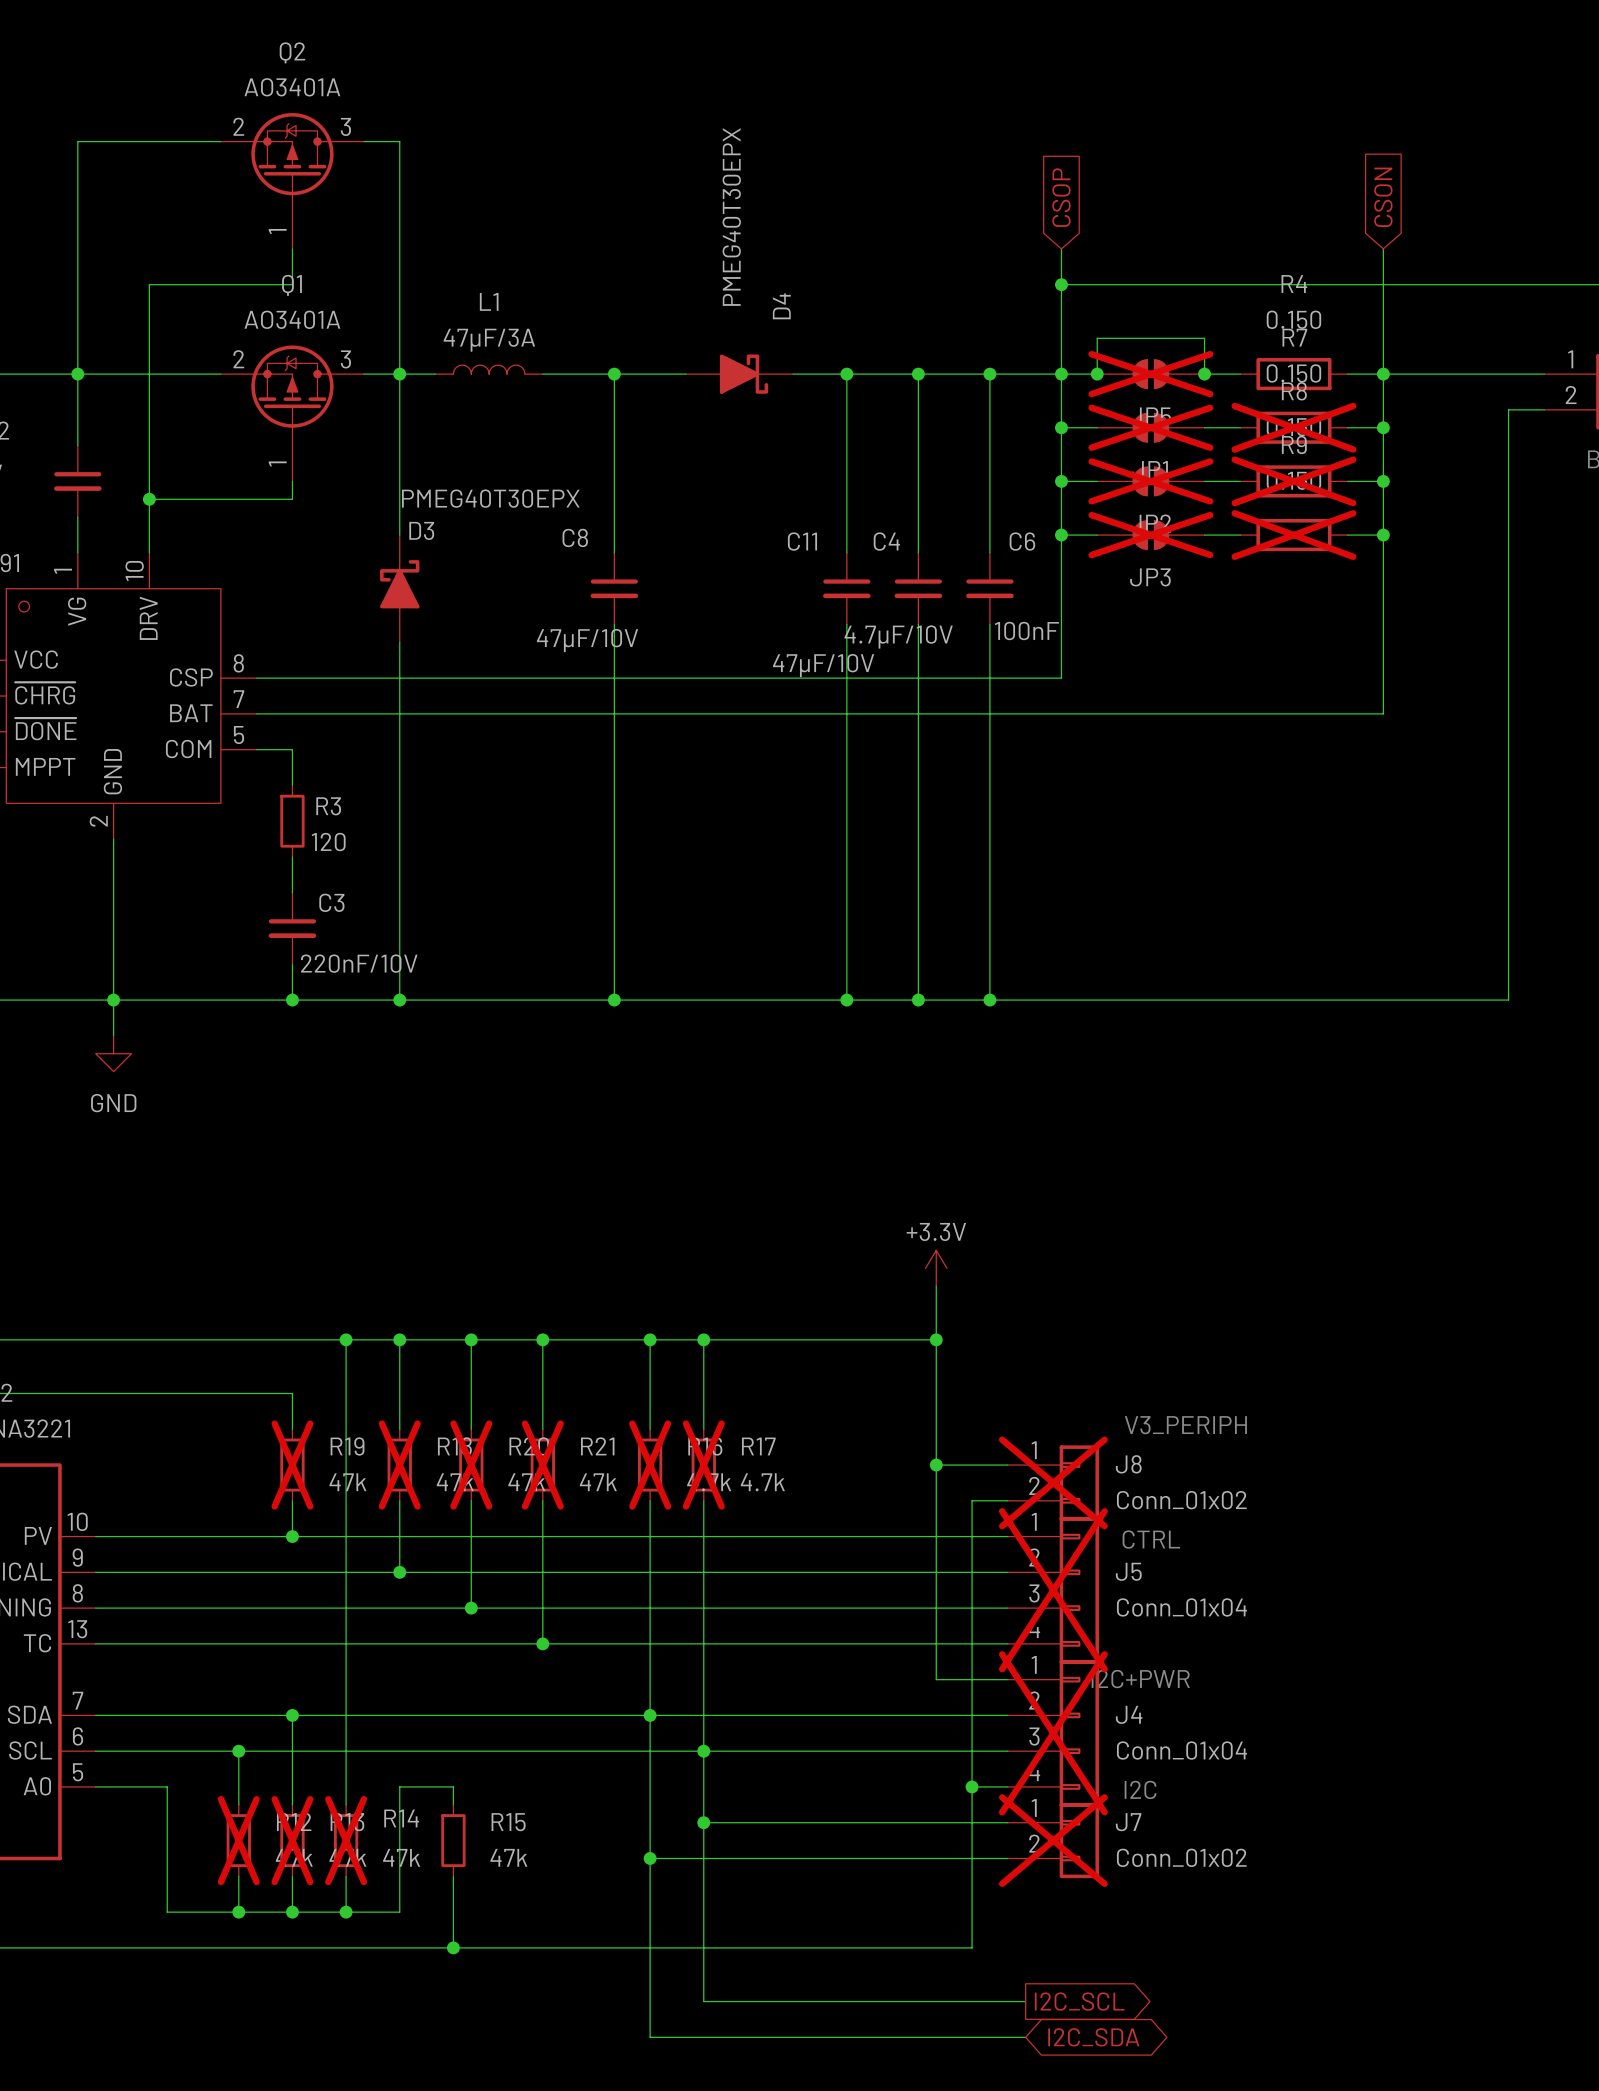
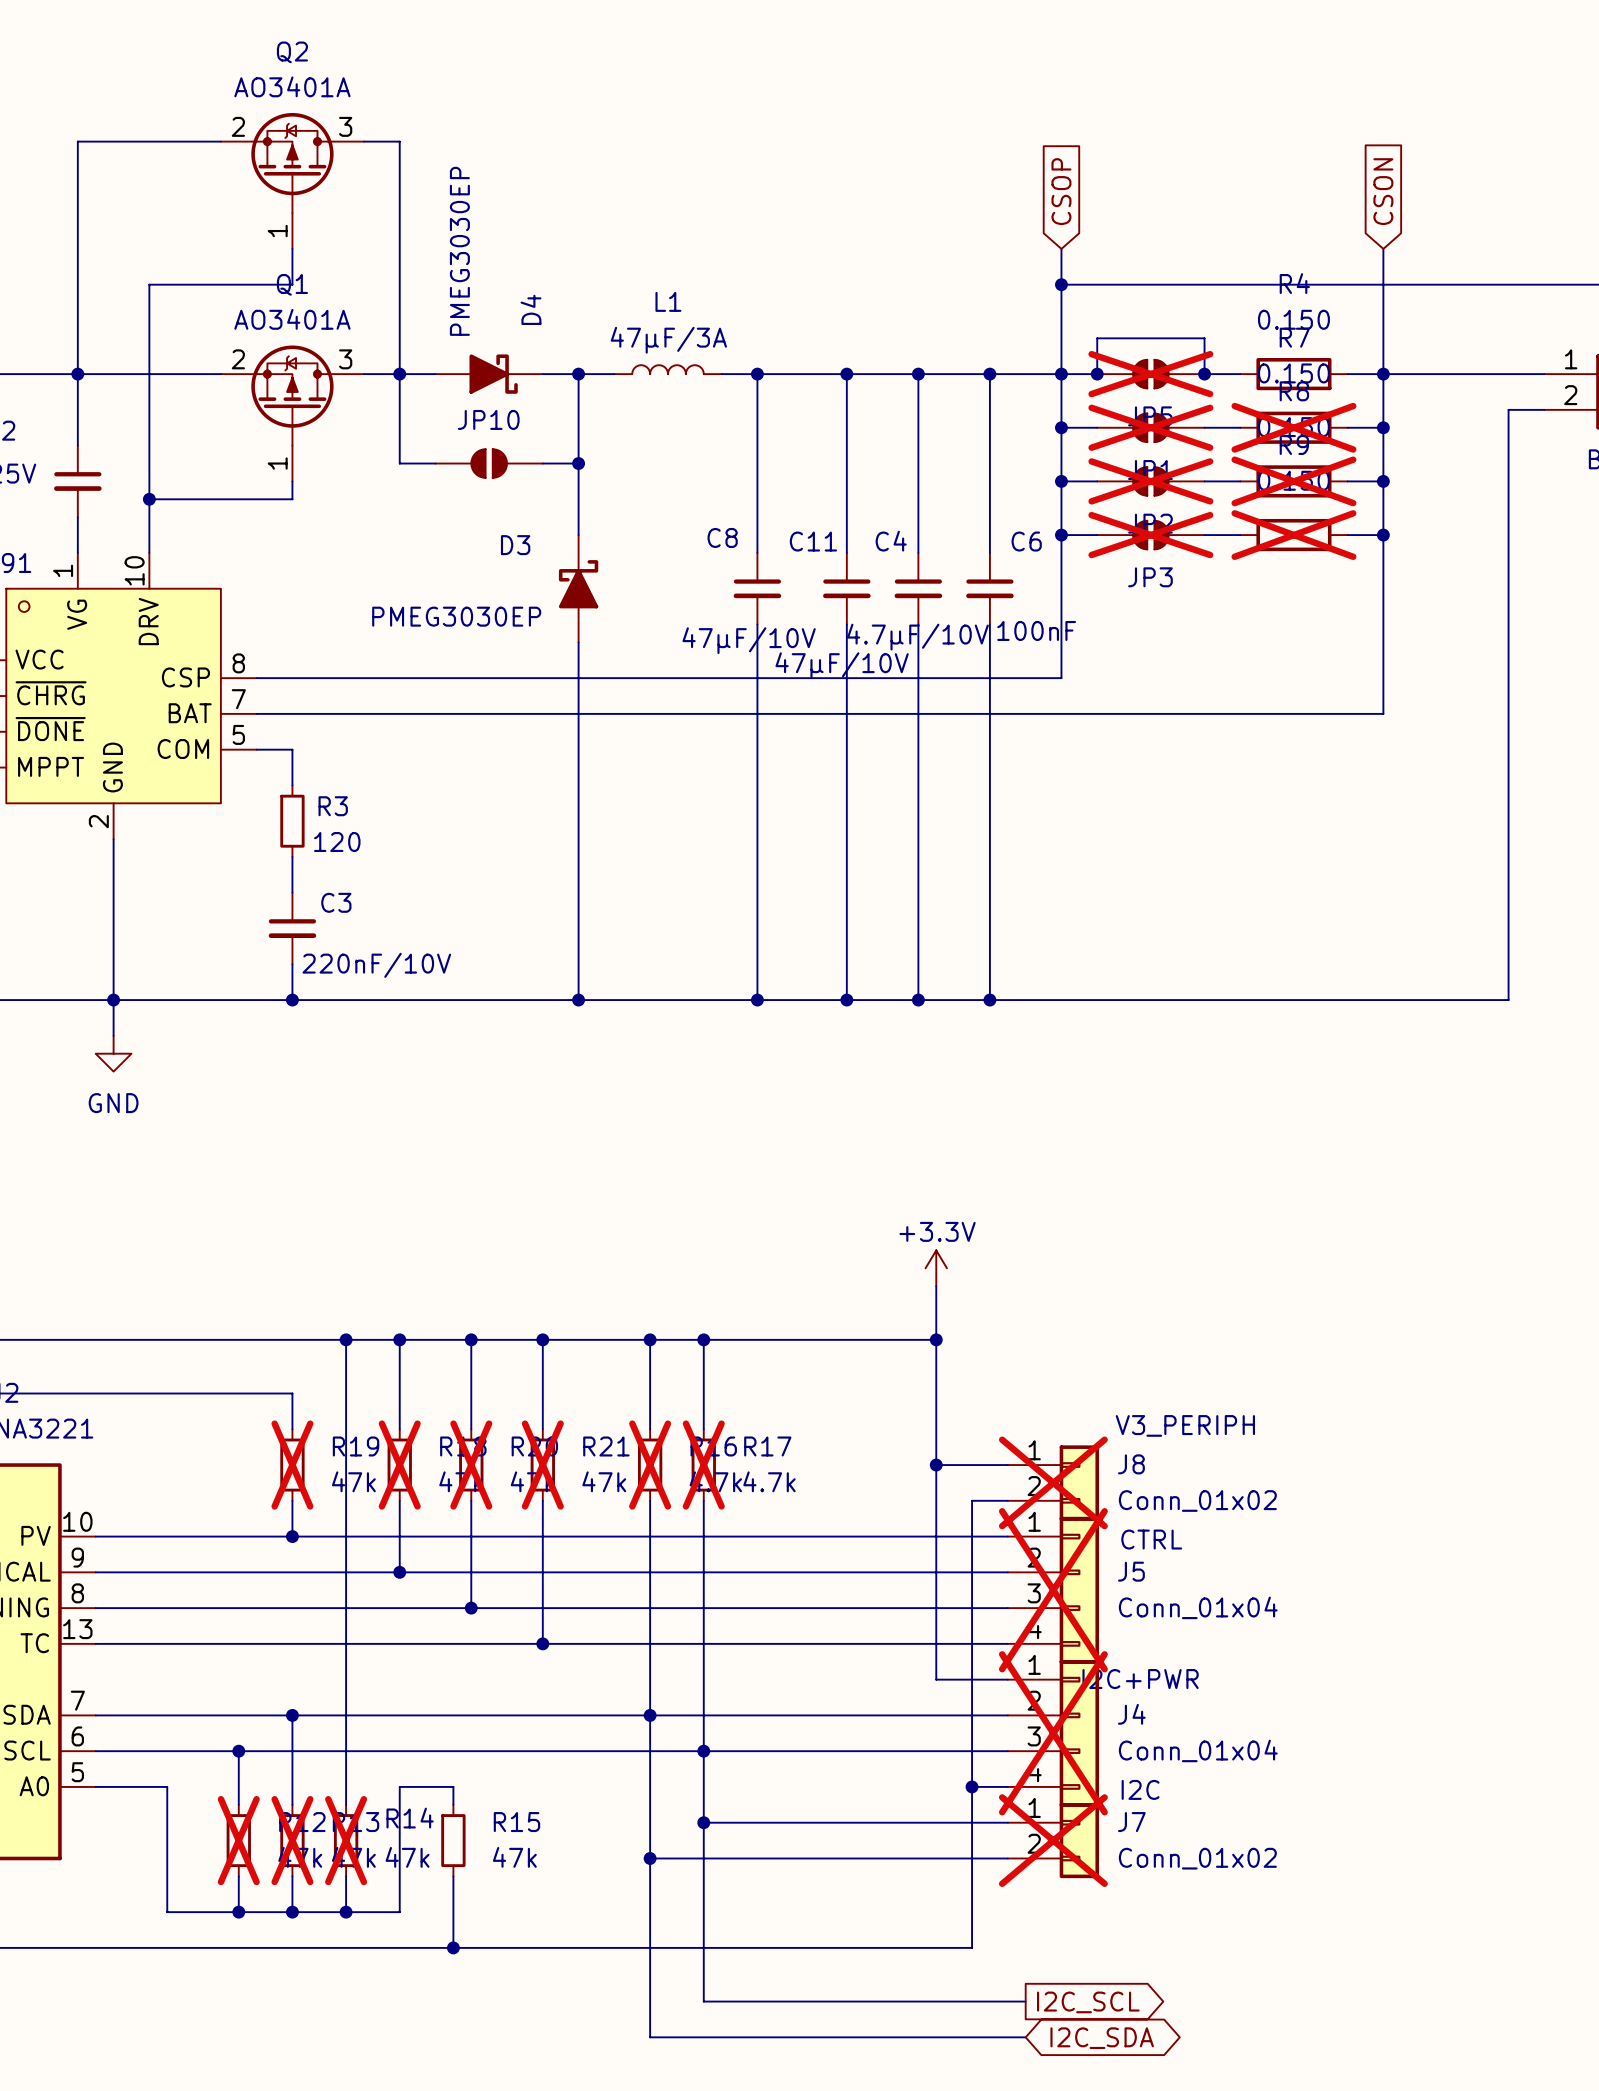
D4 value: PMEG40T30EPX (731, 217) -> PMEG3030EP (459, 251)
L1 position: (489, 369) -> (668, 369)
wire: none -> (578, 374) (578, 535)
junction position: (614, 374) -> (578, 374)
wire: (685, 374) (614, 374) (614, 552) -> none
D4 position: (739, 374) -> (489, 374)
wire: none -> (757, 374) (757, 552)
junction: none -> (757, 374)
wire: (399, 463) (399, 535) -> (399, 463) (435, 463)
JP10: none -> (489, 463)
wire: none -> (542, 463) (578, 463)
junction: none -> (578, 463)
D3 value: PMEG40T30EPX (490, 498) -> PMEG3030EP (456, 616)
D3 name position: D3 (421, 530) -> D3 (515, 545)
D3 position: (399, 588) -> (578, 588)
C8 position: (614, 588) -> (757, 588)
wire: (614, 624) (614, 1000) -> (757, 624) (757, 1000)
wire: (399, 642) (399, 1000) -> (578, 642) (578, 1000)
junction: (399, 1000) -> none
junction position: (614, 1000) -> (578, 1000)
junction: none -> (757, 1000)

